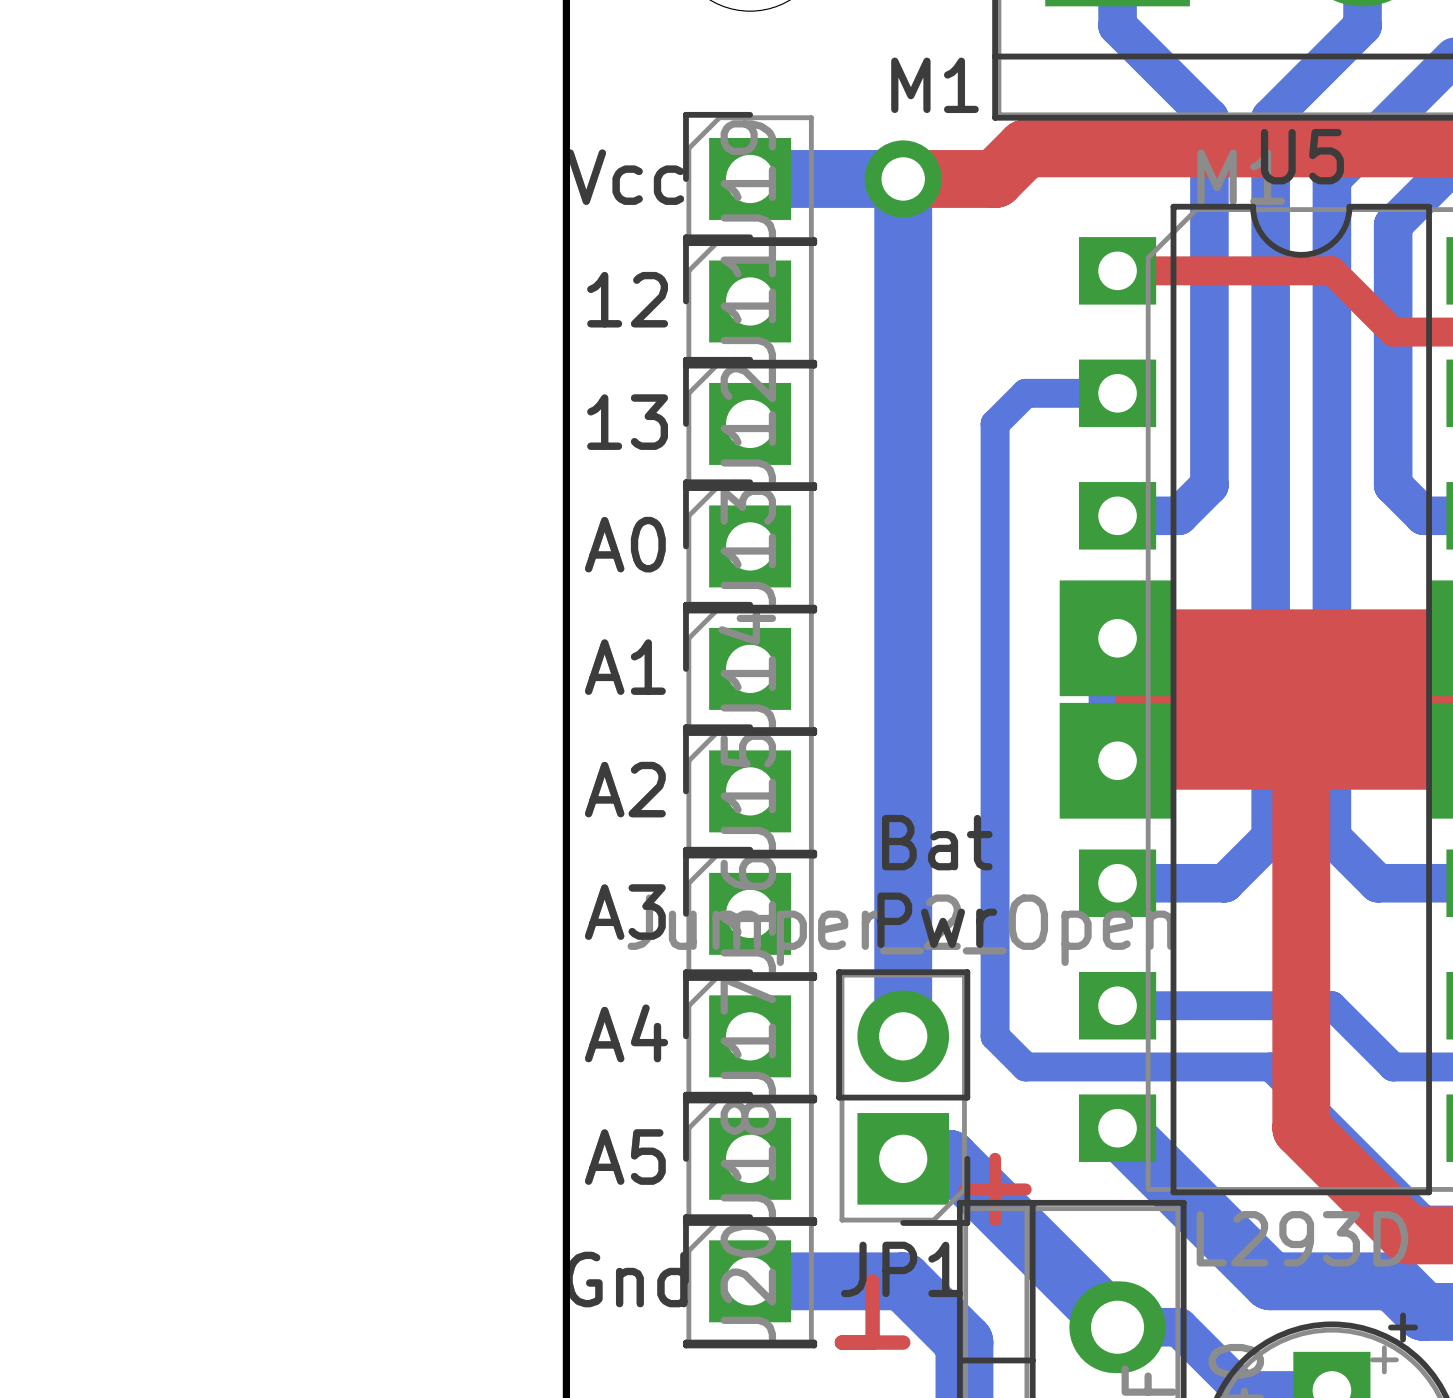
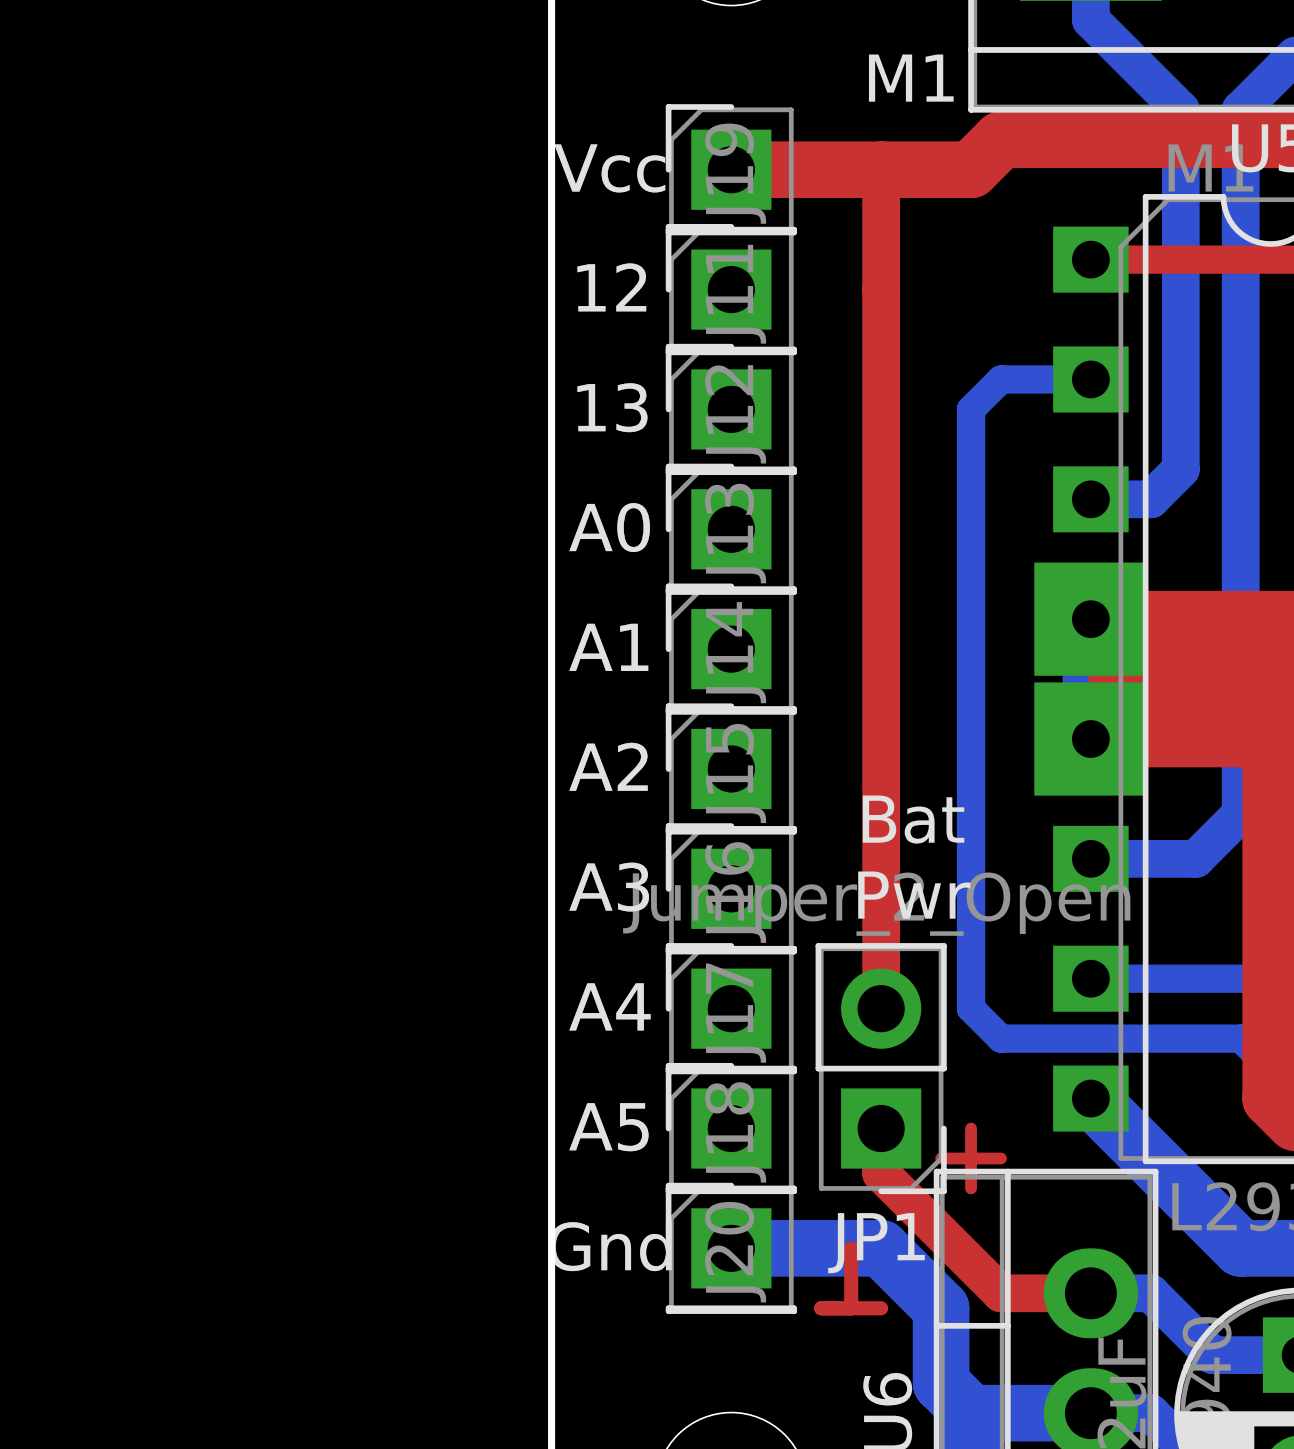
top track: none -> (731, 169) (881, 169) (881, 1008)
bottom track: (750, 178) (903, 178) (903, 1036) -> none
via: (903, 178) -> none
JP1 footprint: [836, 969, 971, 1226] -> [815, 943, 947, 1195]
top track: none -> (881, 1128) (881, 1173) (1001, 1293) (1090, 1293)
bottom track: (903, 1158) (949, 1158) (1117, 1327) -> none

